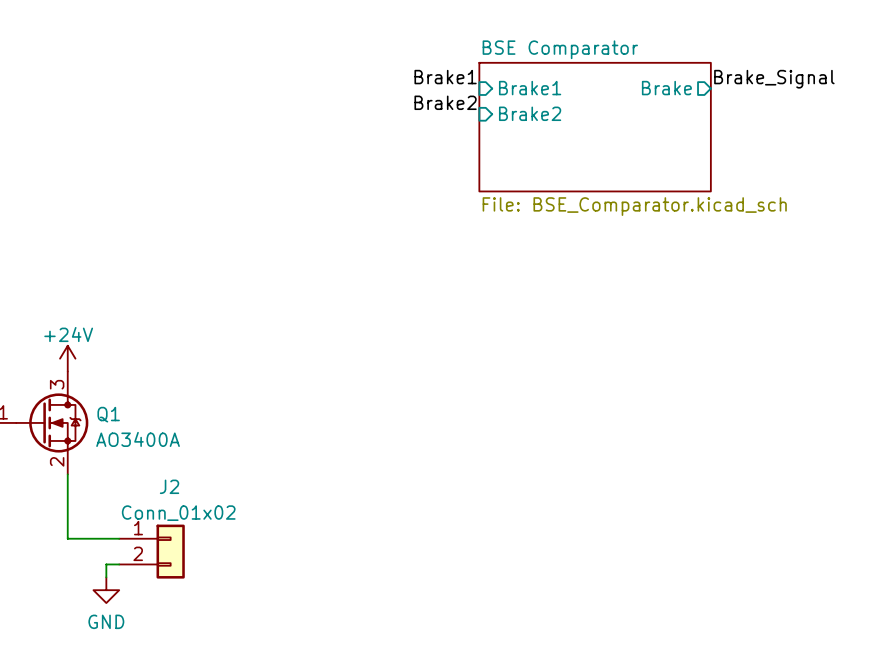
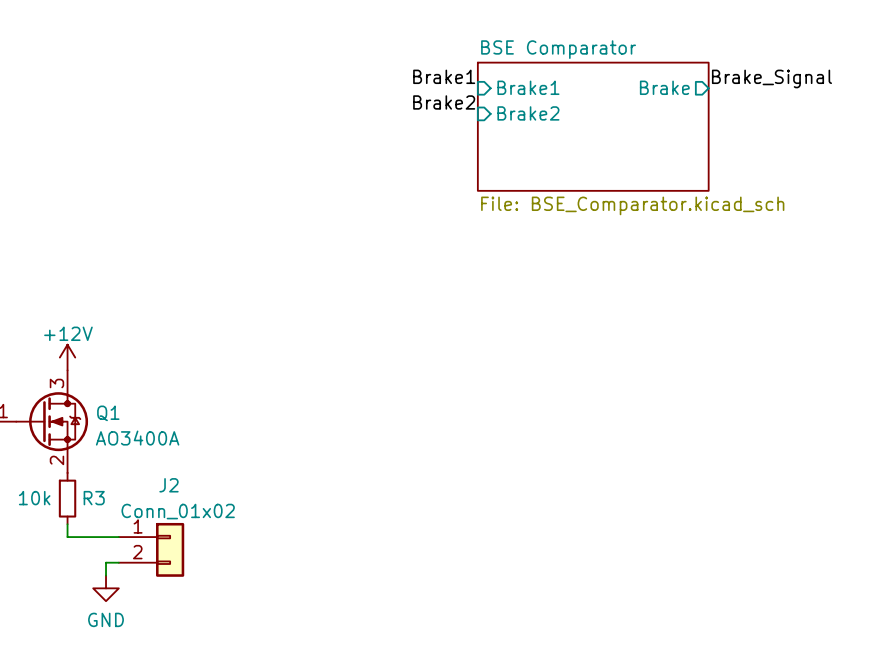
power symbol: +24V (67, 358) -> +12V (67, 357)
wire: (67, 474) (67, 525) -> none
R3: none -> 10k (67, 498)

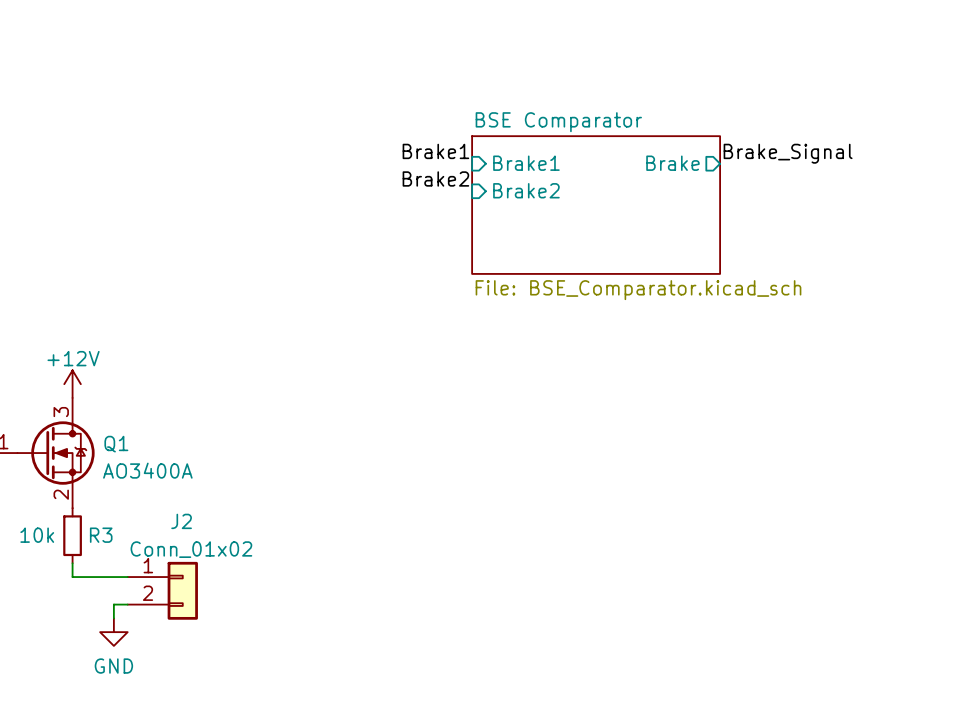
label position: Brake1 (444, 76) -> Brake1 (435, 151)
label position: Brake_Signal (771, 78) -> Brake_Signal (788, 153)
sheet pin position: Brake1 (528, 87) -> Brake1 (526, 163)
sheet pin position: Brake (664, 87) -> Brake (672, 163)
label position: Brake2 (444, 102) -> Brake2 (435, 178)
sheet pin position: Brake2 (528, 113) -> Brake2 (526, 190)
sheet BSE Comparator position: (593, 126) -> (596, 205)

